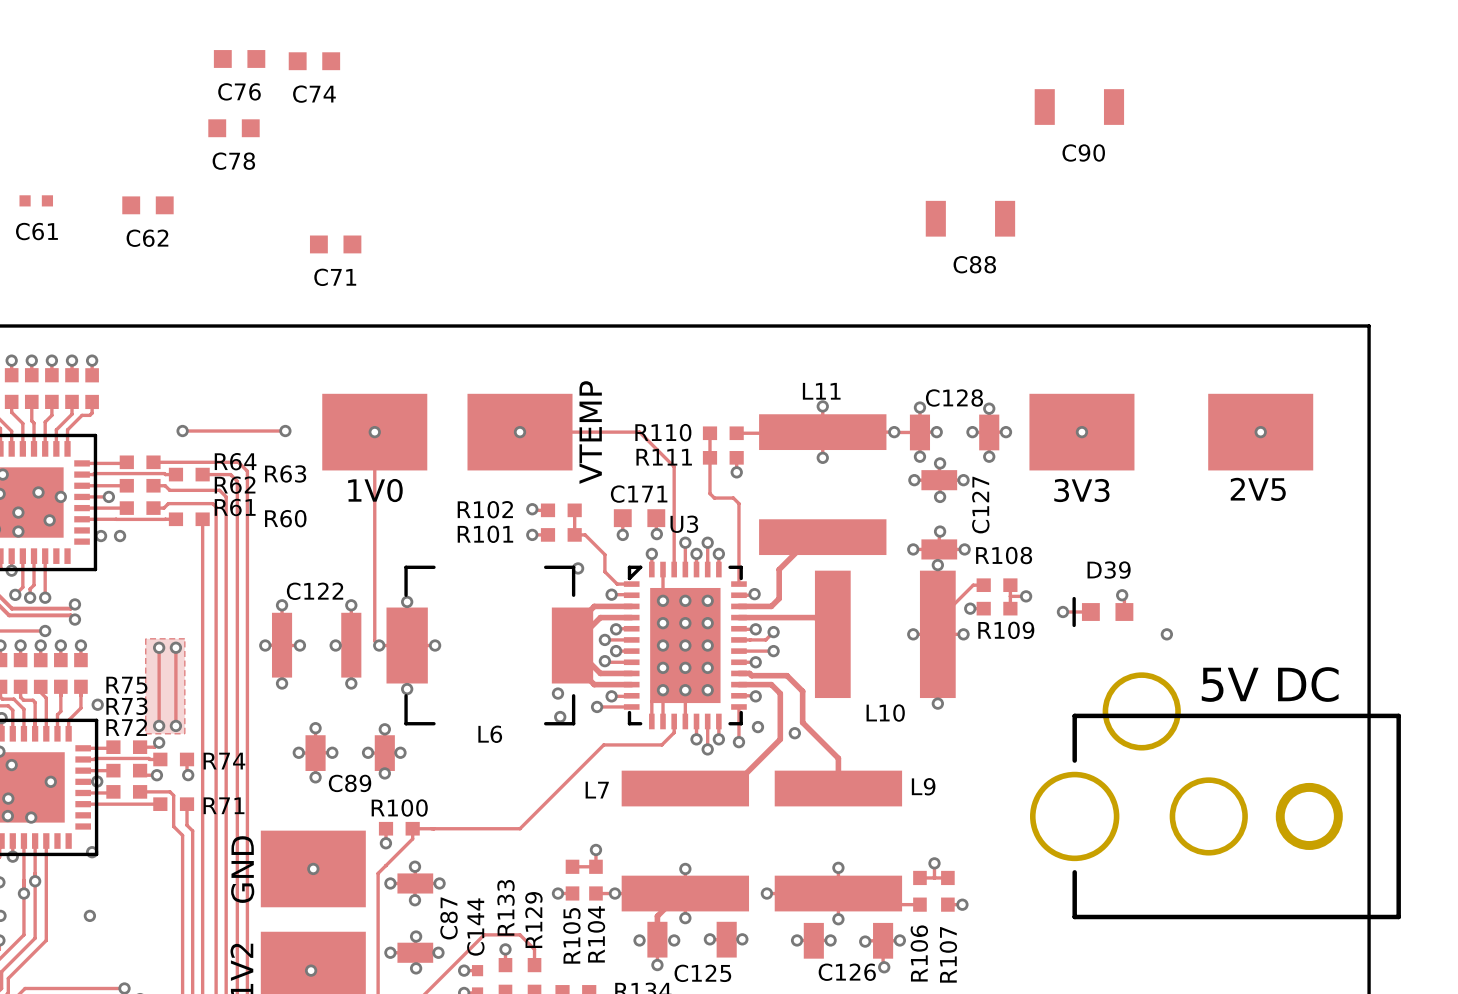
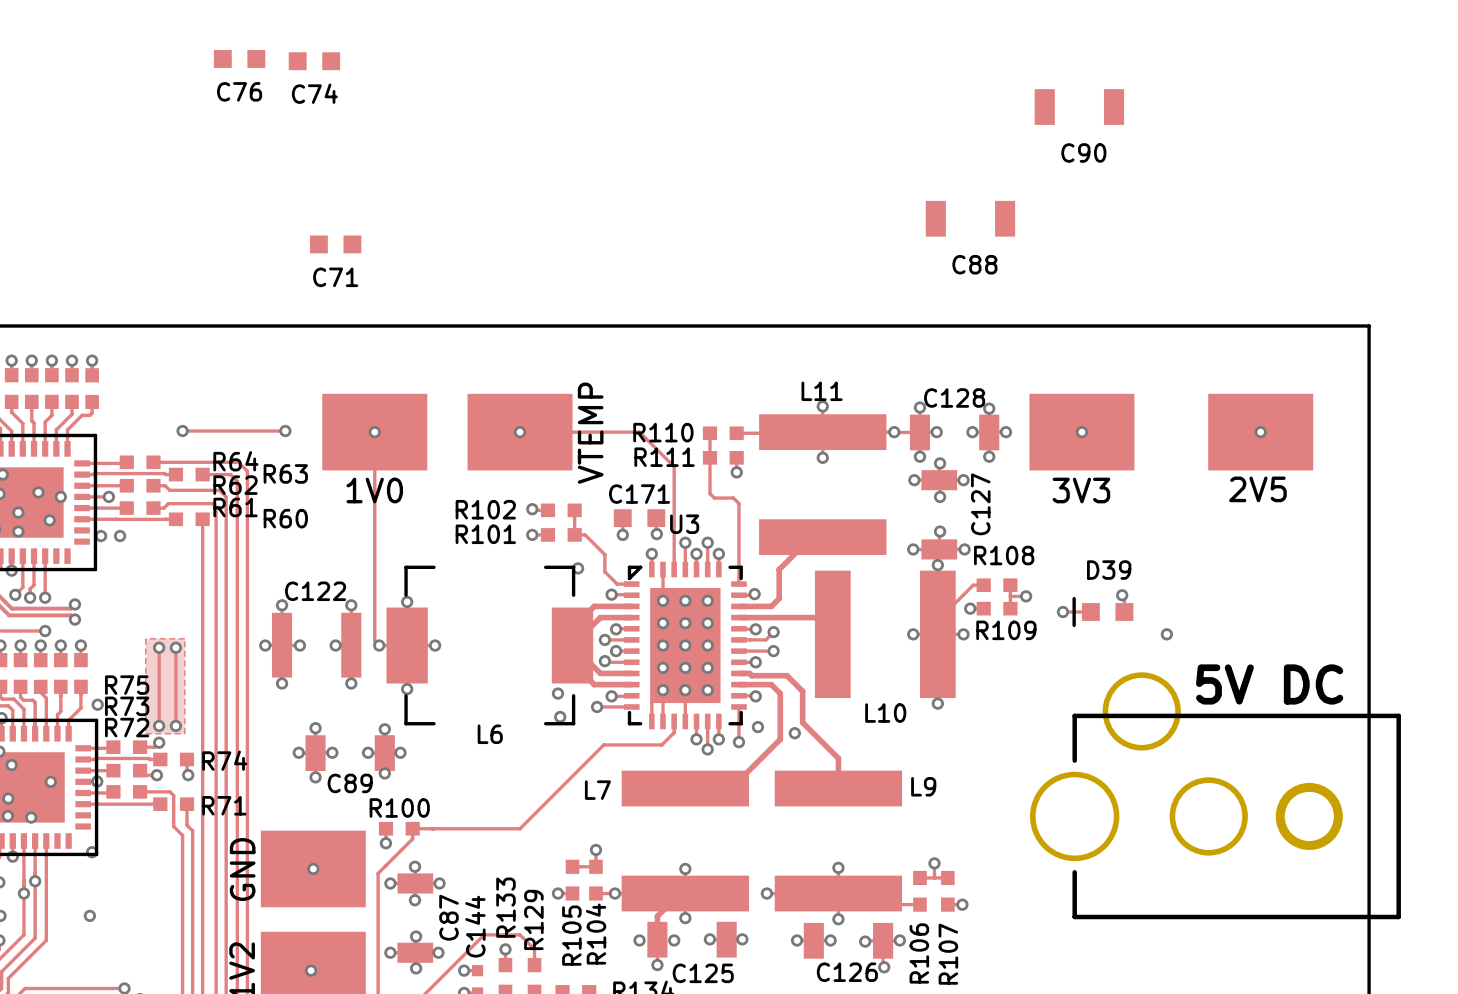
C78: (233, 128) -> none
C61: (36, 200) -> none
C62: (147, 205) -> none

